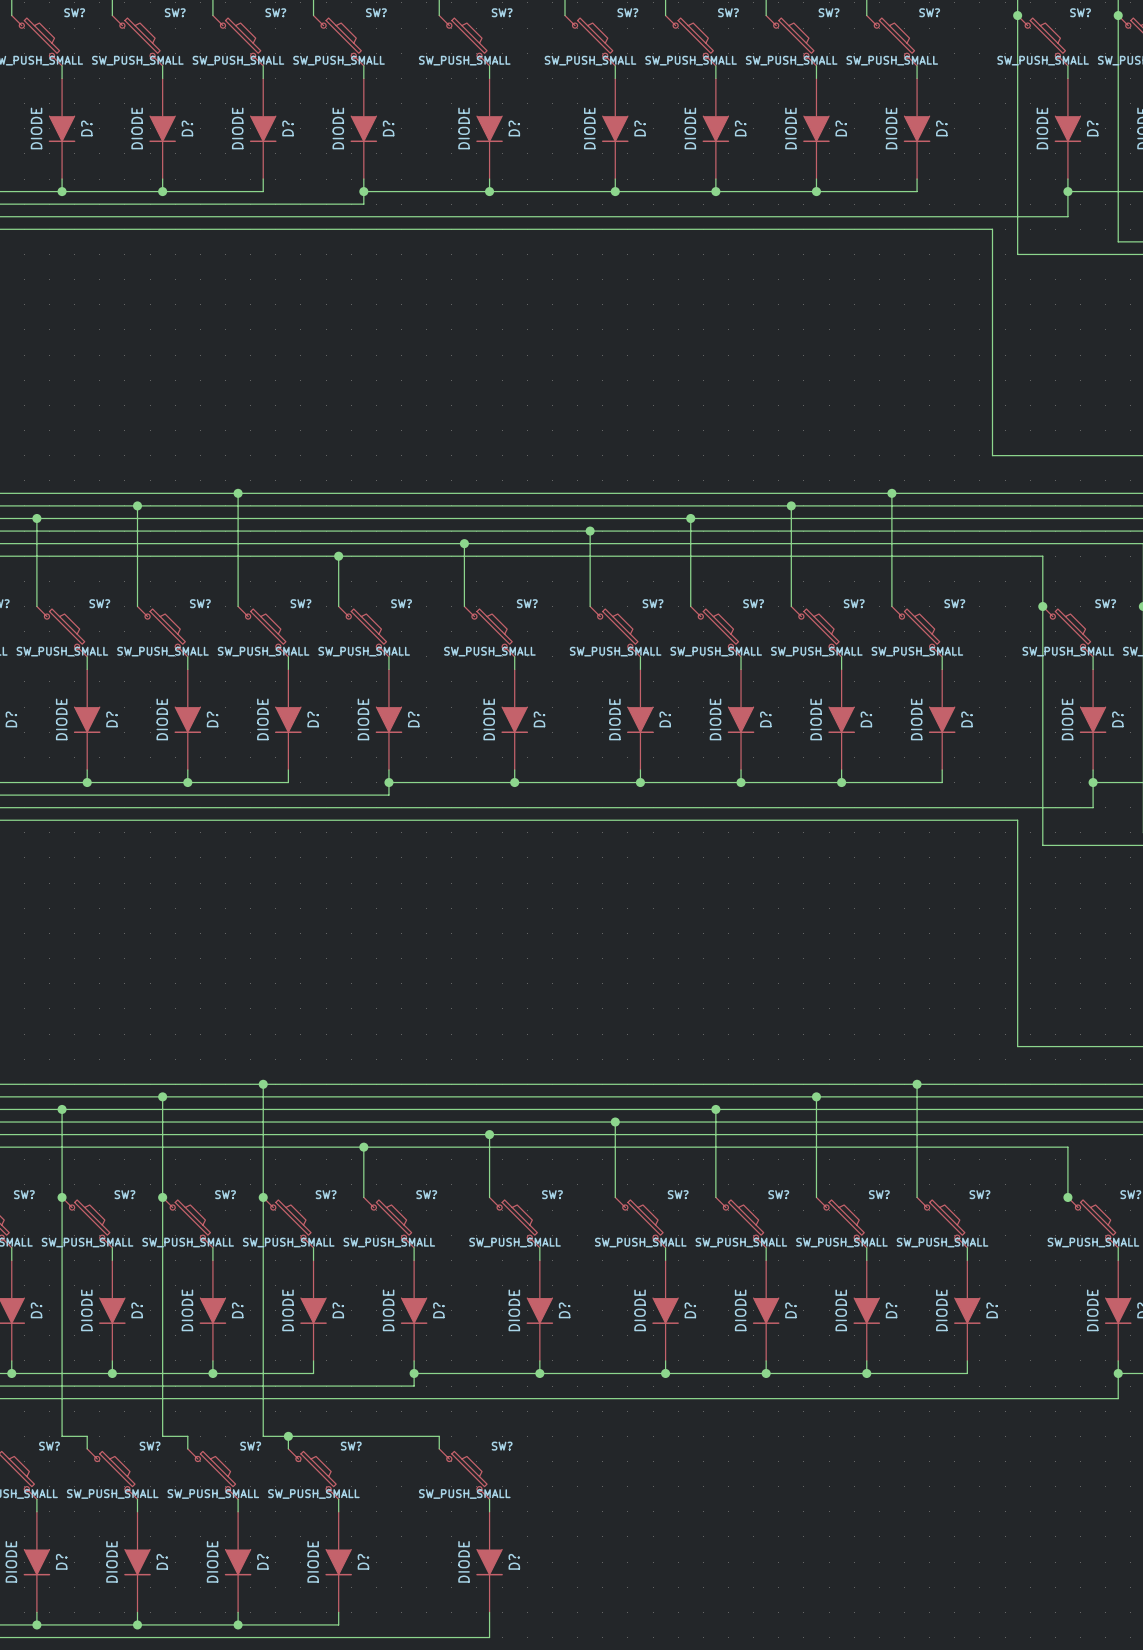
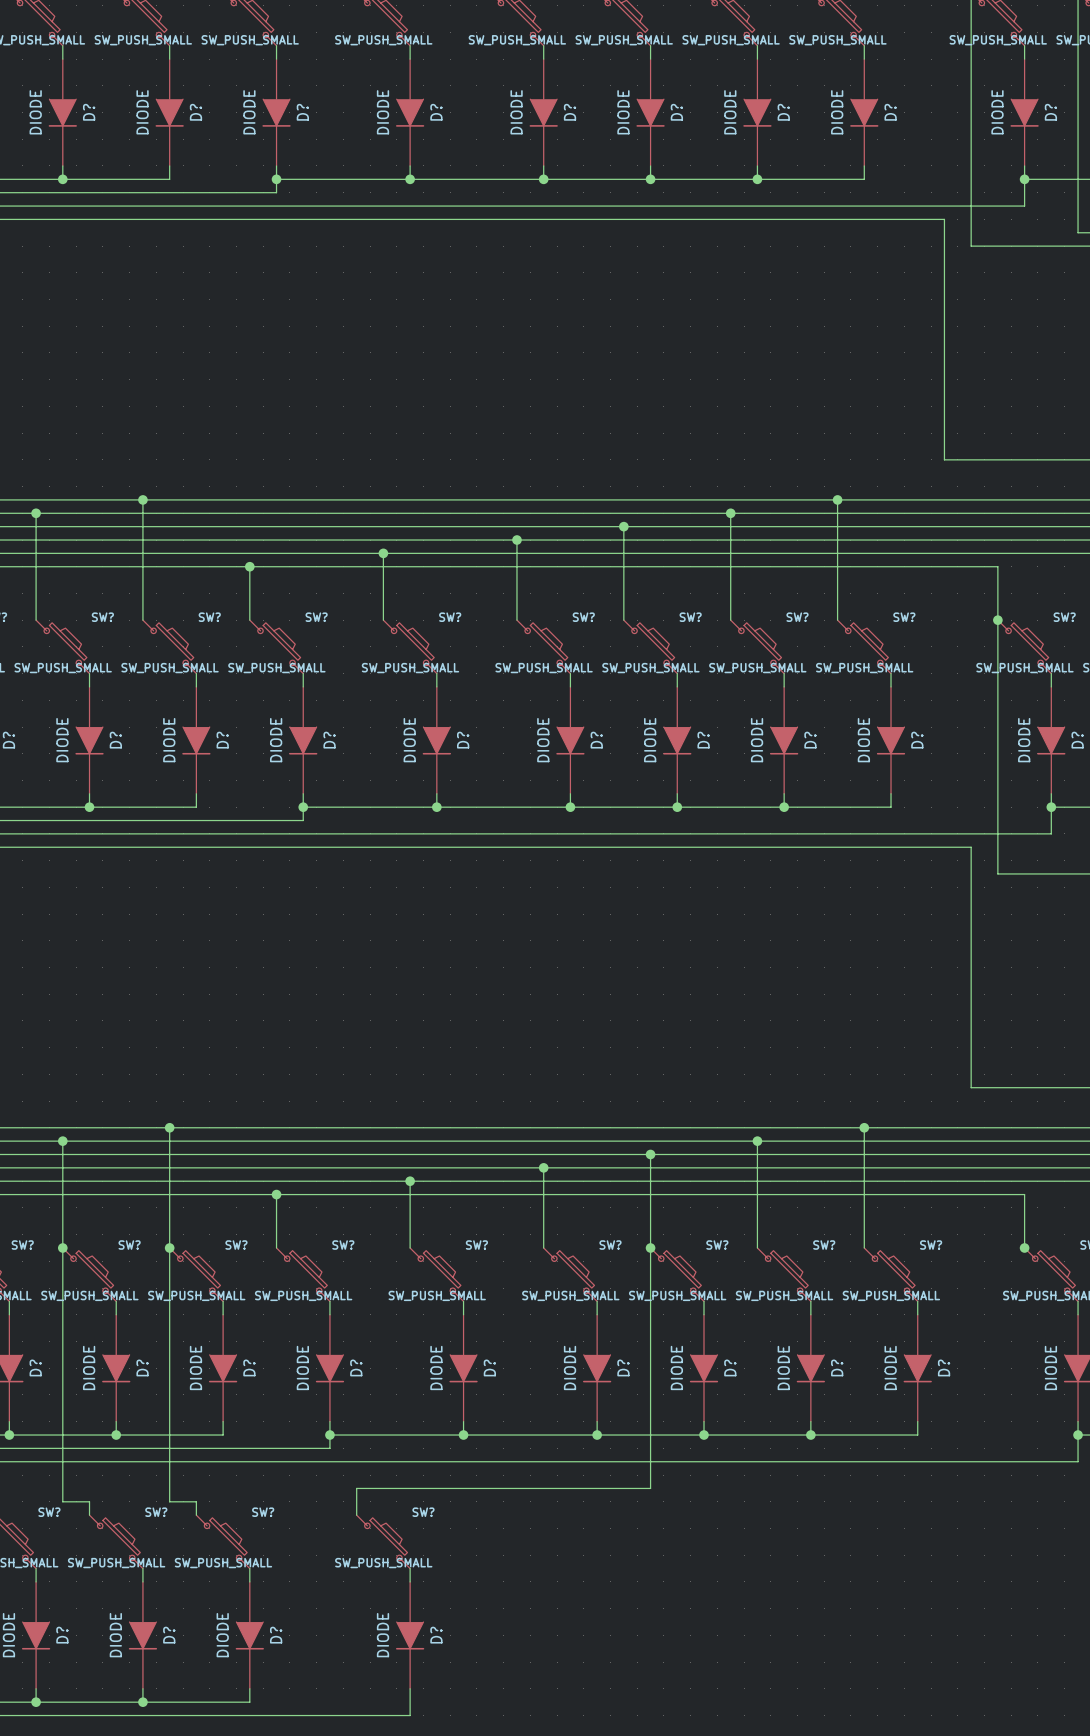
junction: none -> (650, 1247)
wire: (288, 1436) (439, 1436) -> (650, 1247) (650, 1488) (356, 1488) (356, 1501)
junction: (288, 1436) -> none

